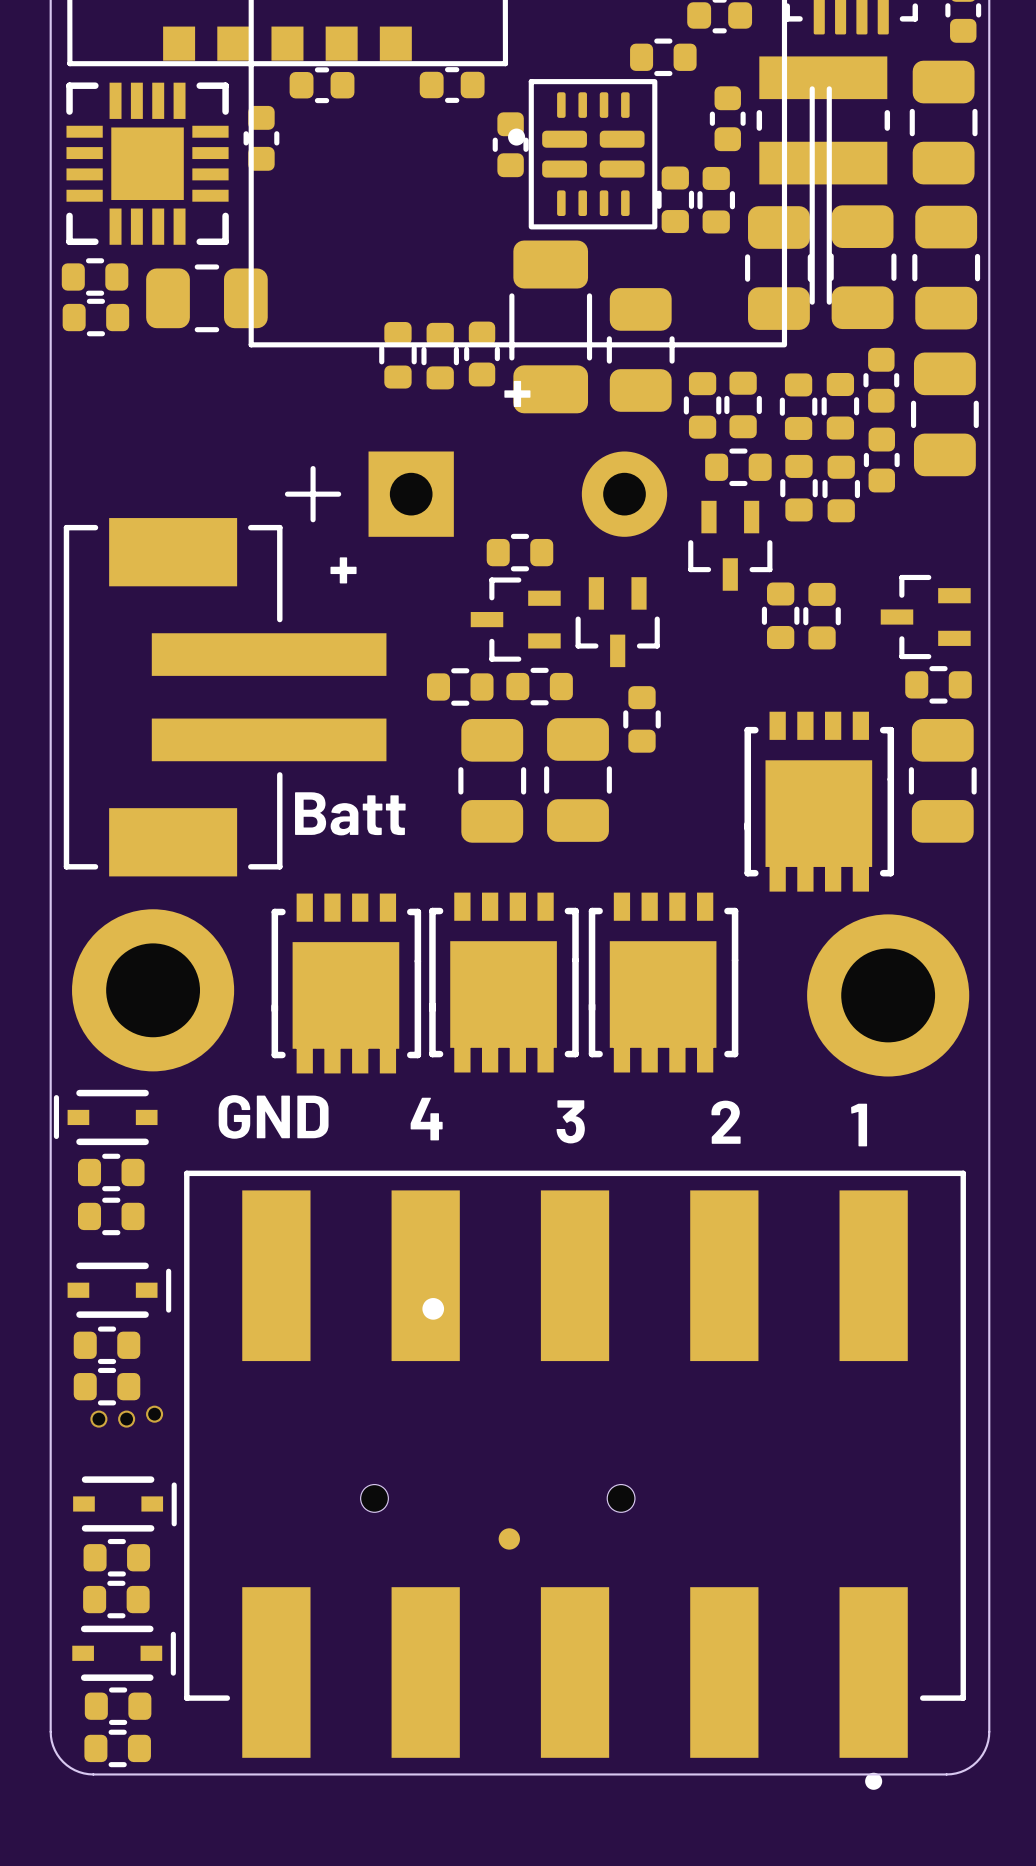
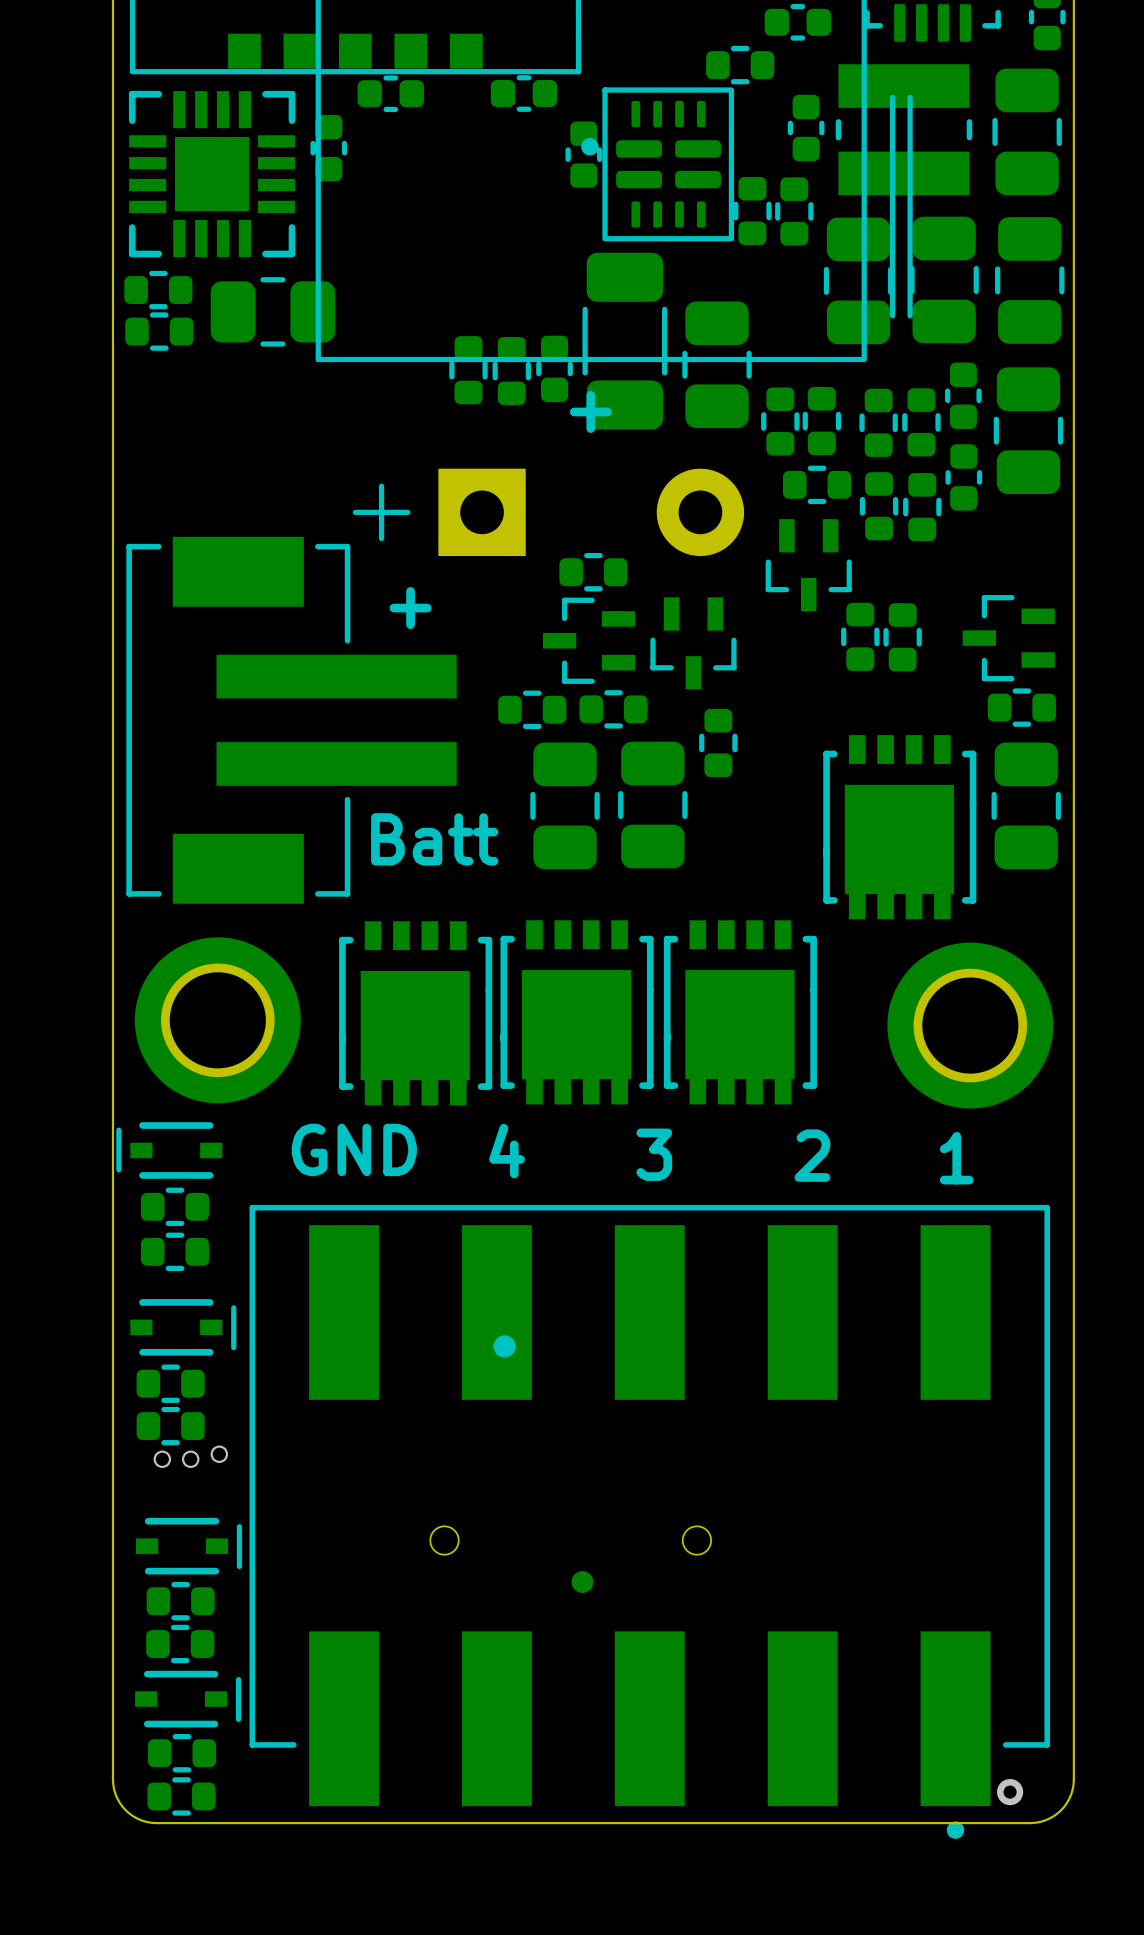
via: none -> (1010, 1792)

